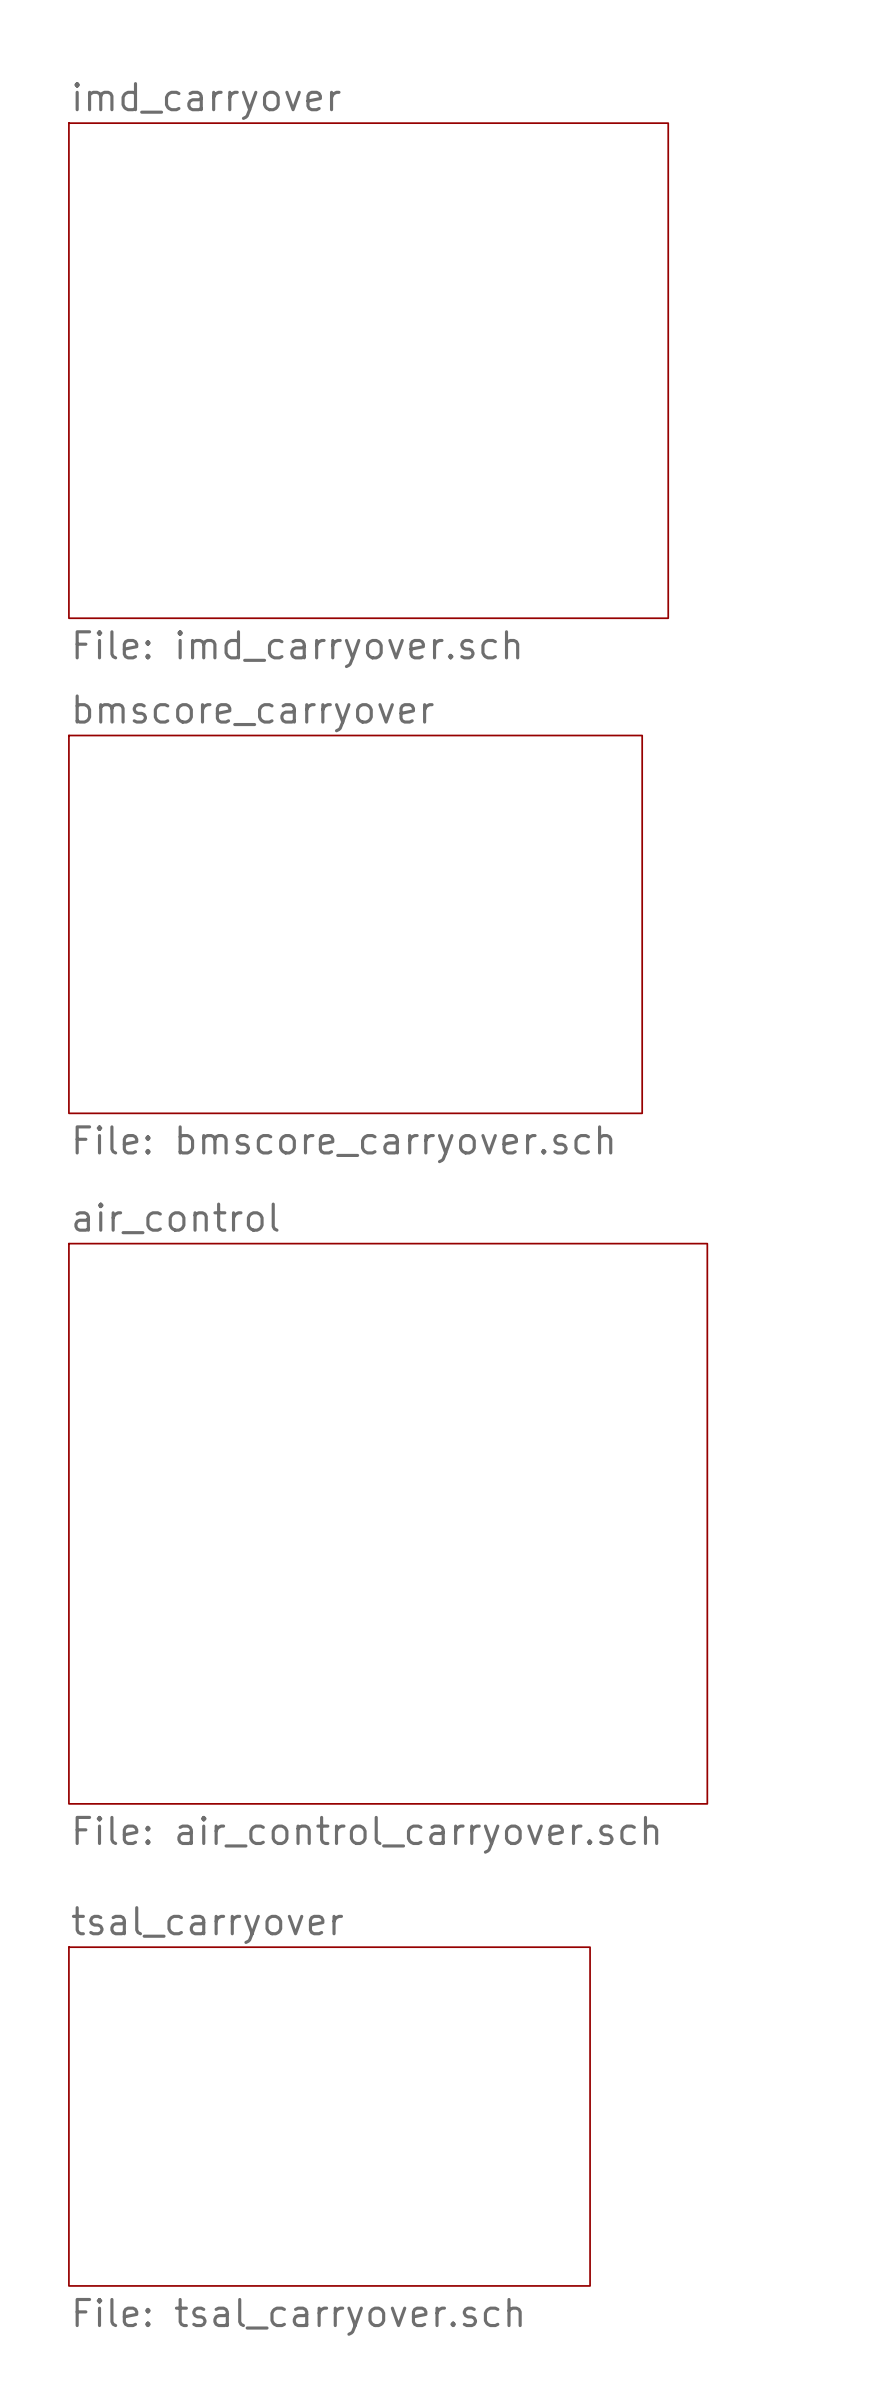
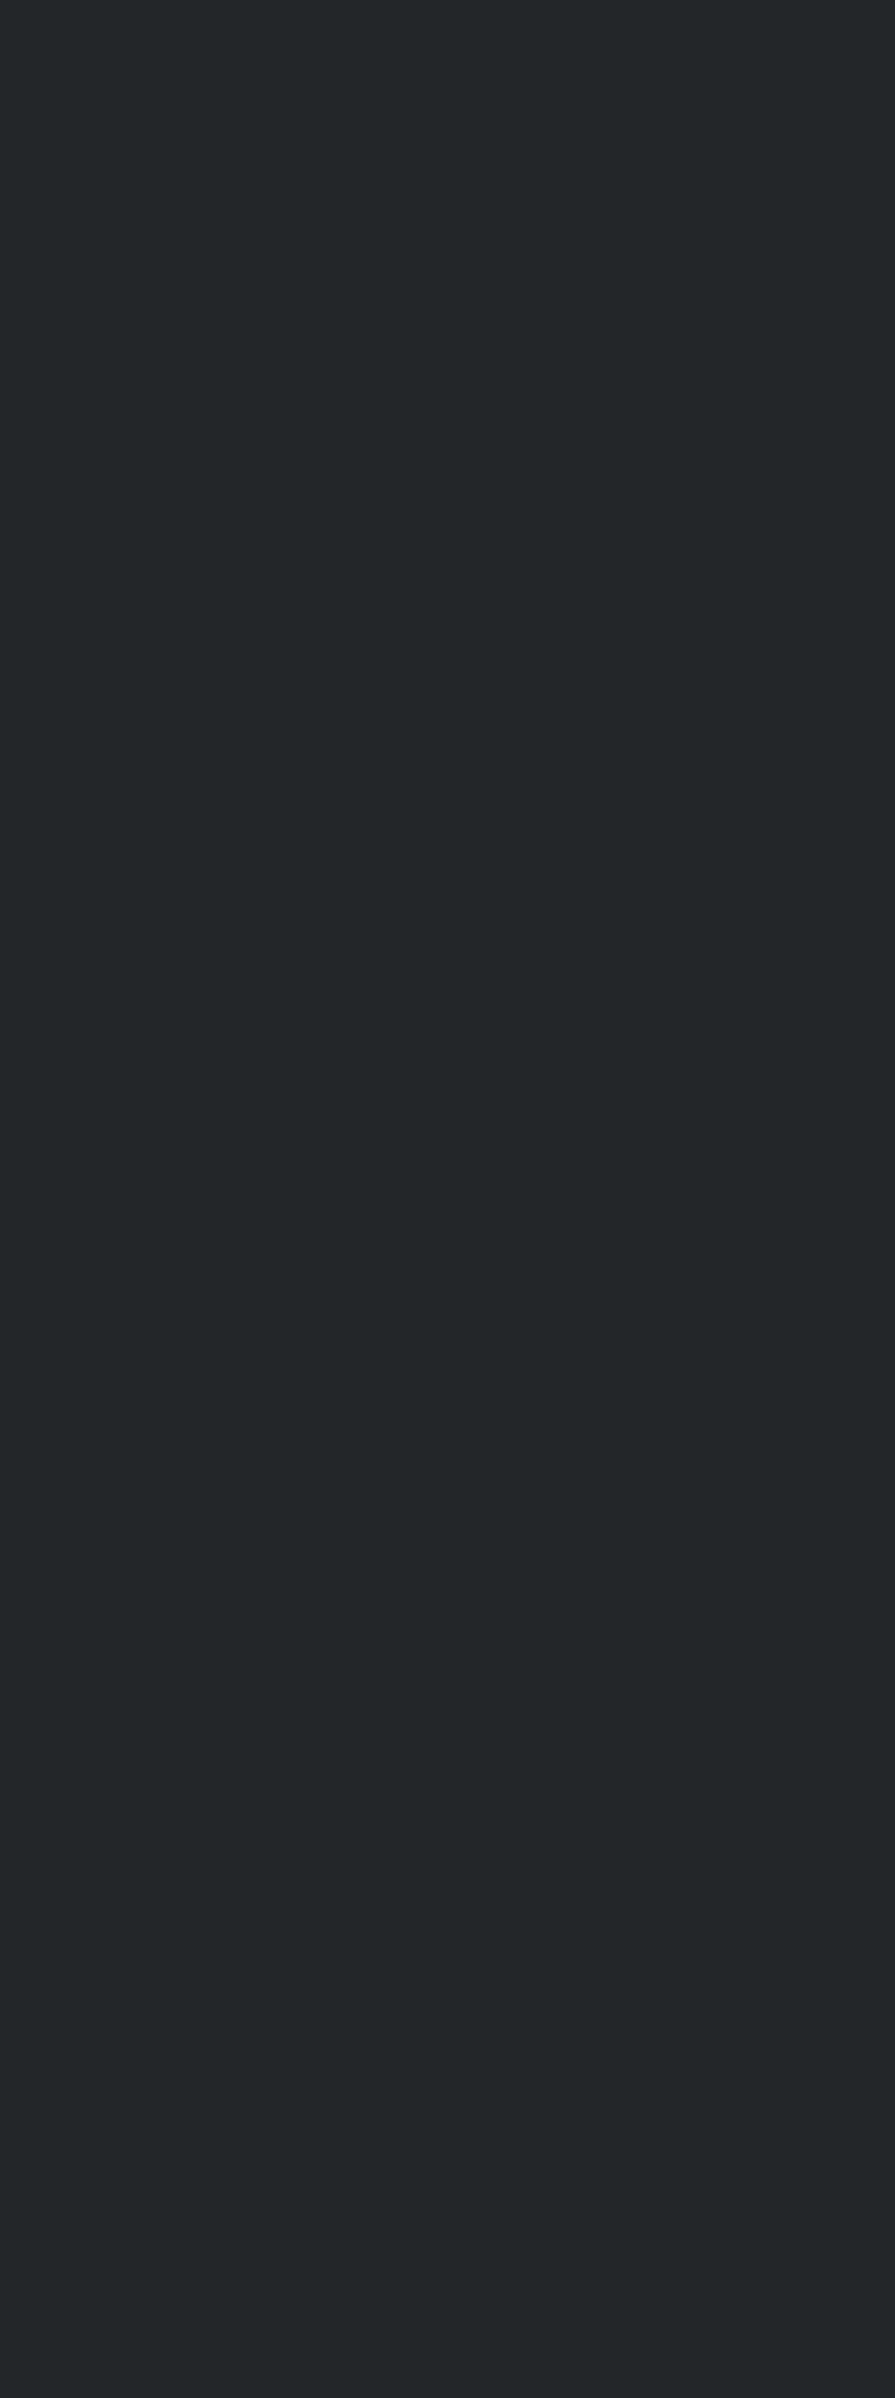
sheet imd_carryover: File: imd_carryover.sch (368, 370) -> none
sheet bmscore_carryover: File: bmscore_carryover.sch (355, 924) -> none
sheet air_control: File: air_control_carryover.sch (388, 1523) -> none
sheet tsal_carryover: File: tsal_carryover.sch (329, 2116) -> none

